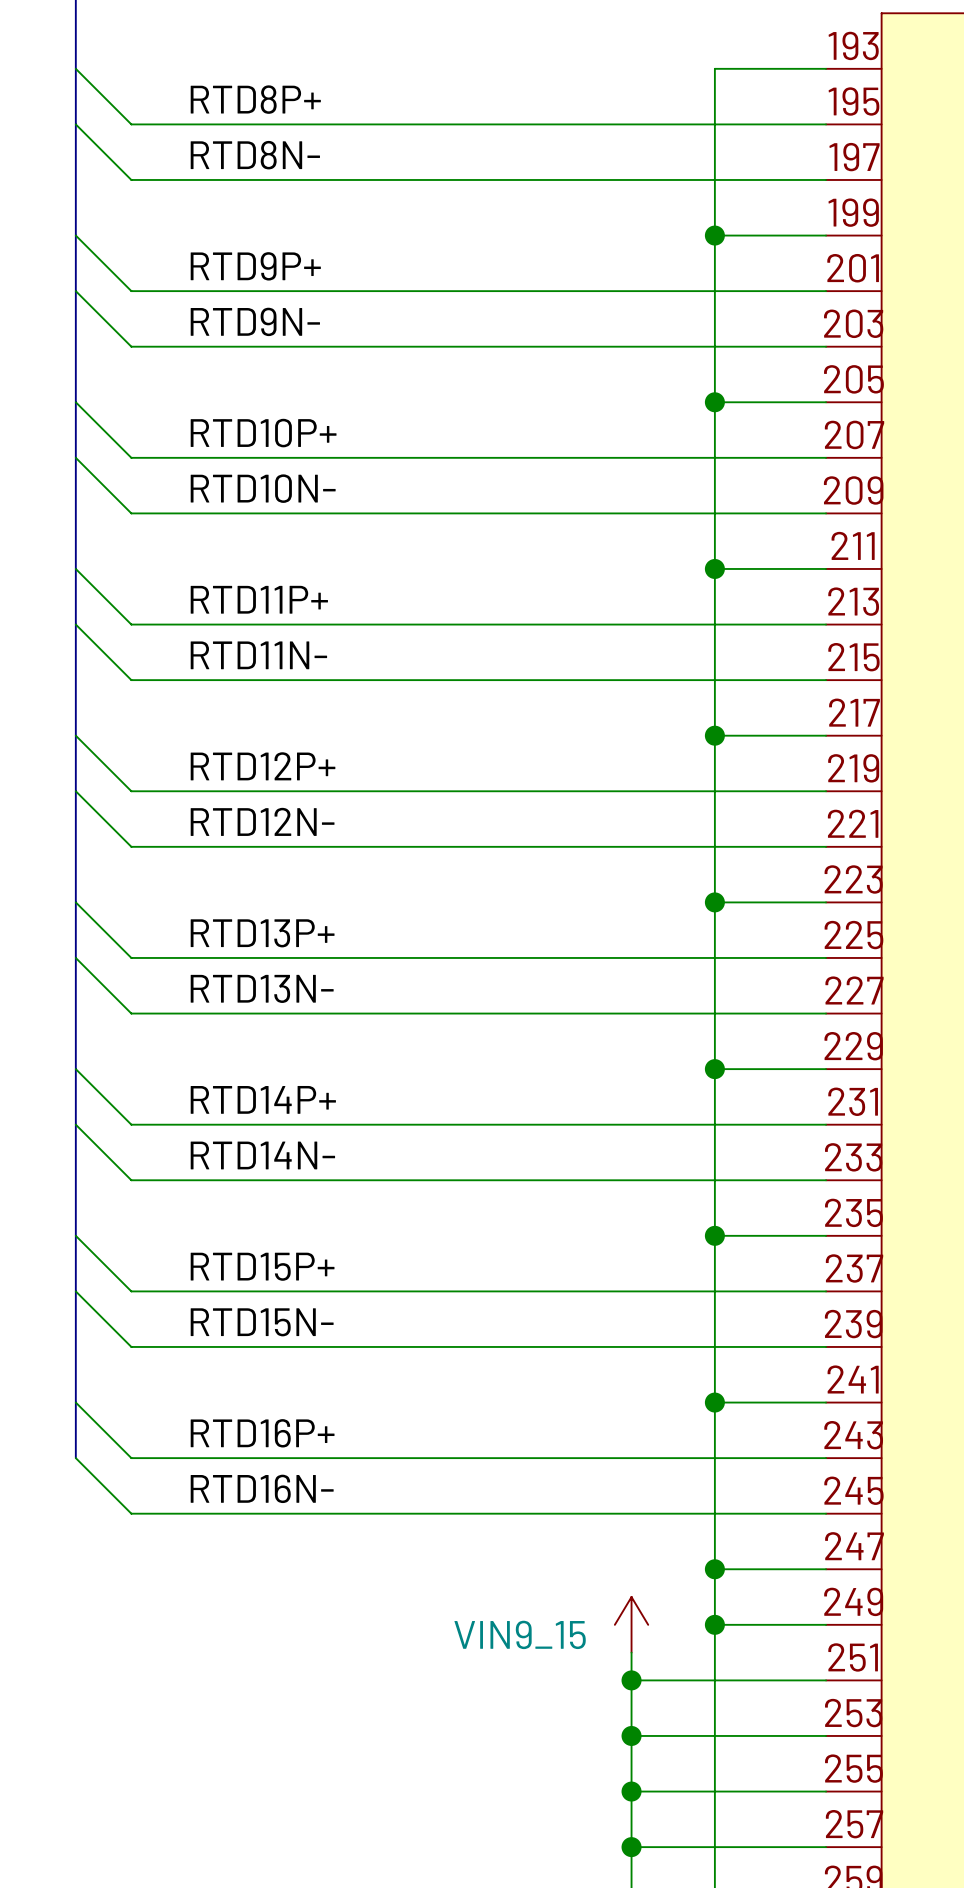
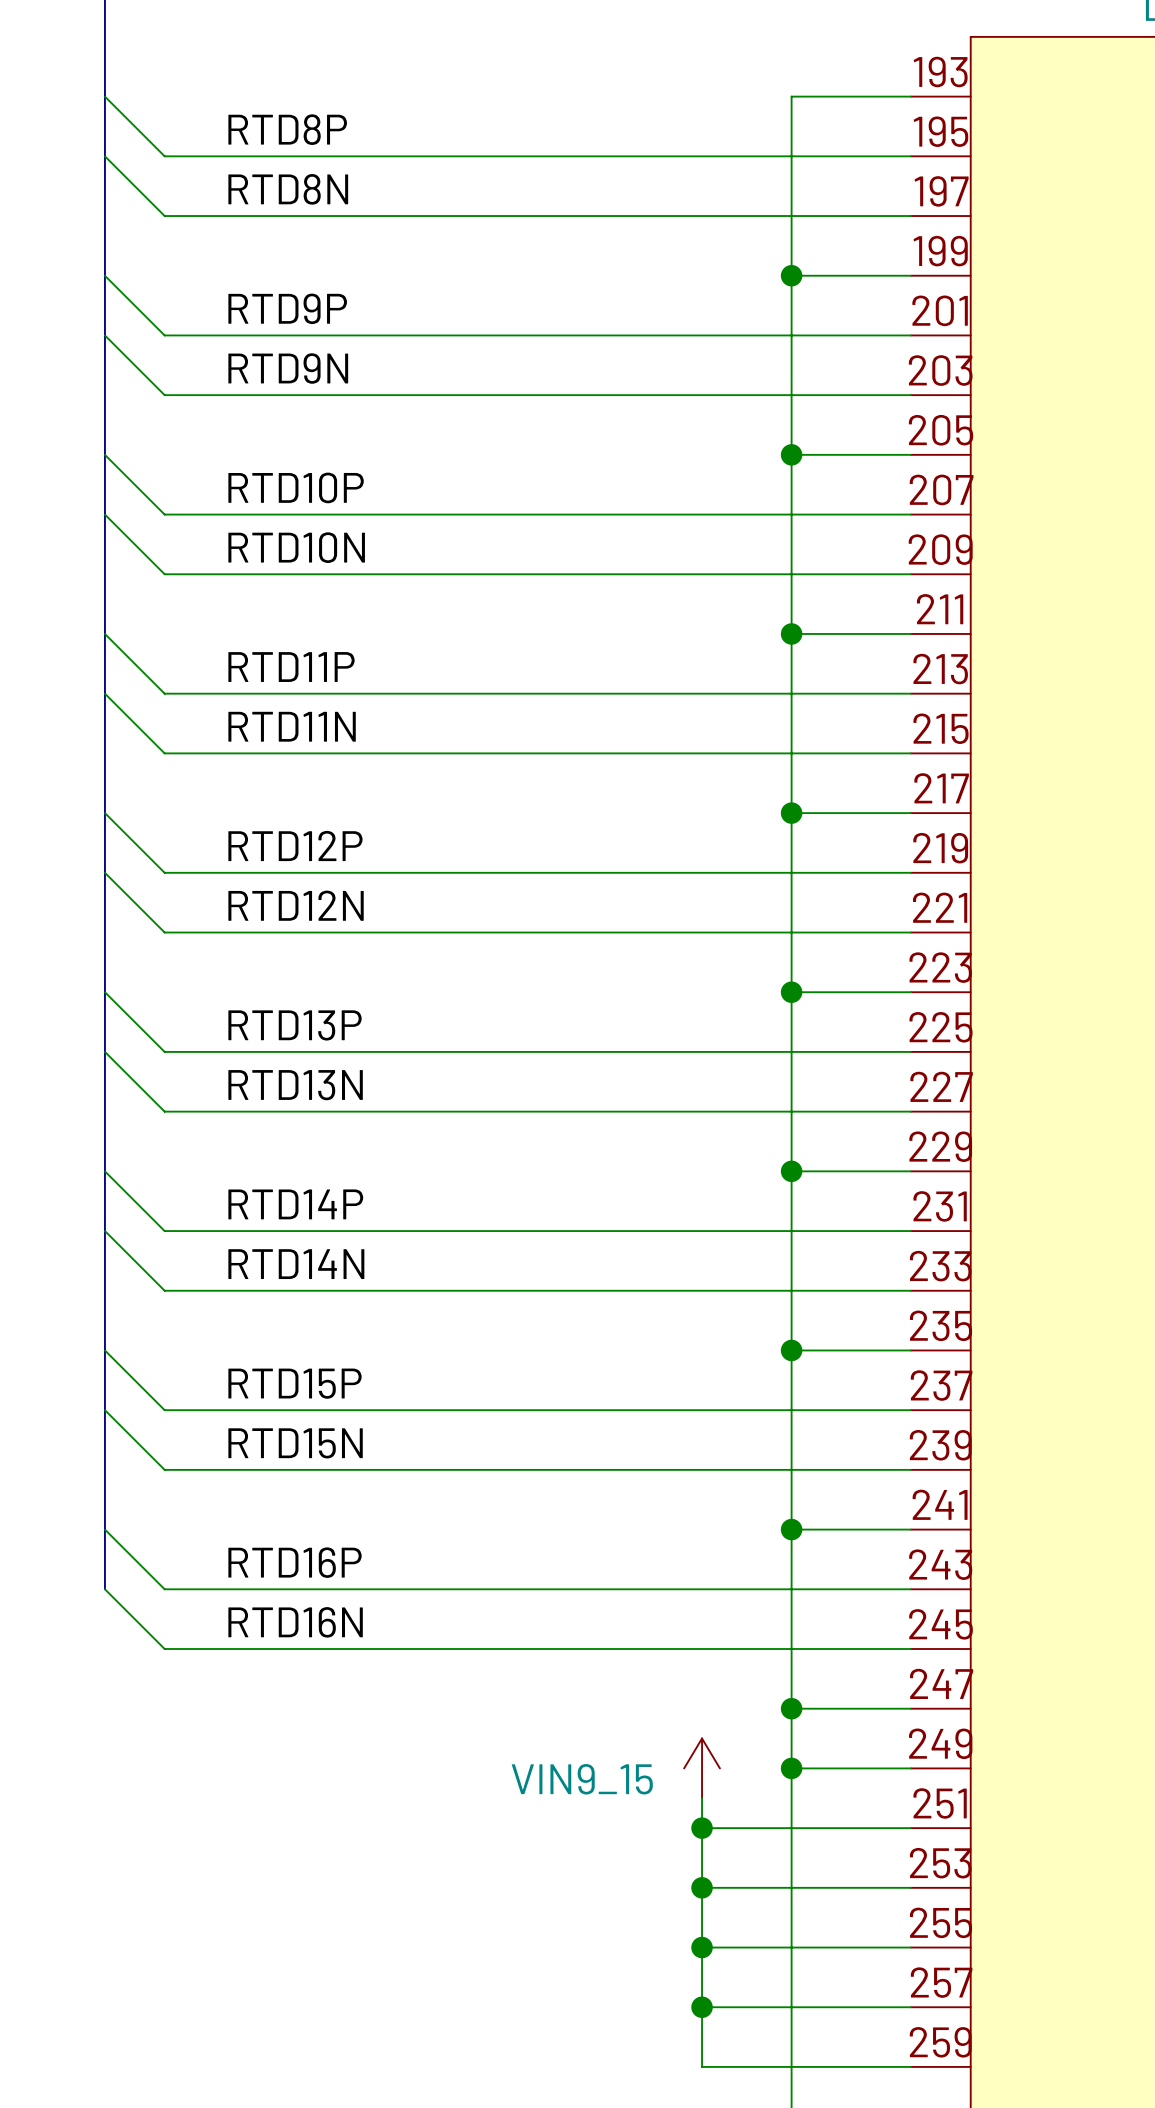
label: RTD8P+ (255, 99) -> RTD8P (287, 129)
label: RTD8N- (255, 155) -> RTD8N (288, 189)
label: RTD9P+ (255, 266) -> RTD9P (287, 308)
label: RTD9N- (255, 321) -> RTD9N (288, 368)
label: RTD10P+ (263, 433) -> RTD10P (296, 487)
label: RTD10N- (263, 488) -> RTD10N (296, 547)
label: RTD11P+ (259, 599) -> RTD11P (291, 667)
label: RTD11N- (258, 655) -> RTD11N (292, 726)
label: RTD12P+ (263, 766) -> RTD12P (295, 845)
label: RTD12N- (262, 821) -> RTD12N (296, 905)
label: RTD13P+ (262, 933) -> RTD13P (295, 1025)
label: RTD13N- (262, 988) -> RTD13N (295, 1085)
label: RTD14P+ (263, 1099) -> RTD14P (295, 1204)
label: RTD14N- (262, 1155) -> RTD14N (296, 1264)
label: RTD15P+ (262, 1266) -> RTD15P (295, 1383)
label: RTD15N- (262, 1322) -> RTD15N (295, 1443)
label: RTD16P+ (262, 1433) -> RTD16P (295, 1562)
label: RTD16N- (262, 1488) -> RTD16N (295, 1622)

